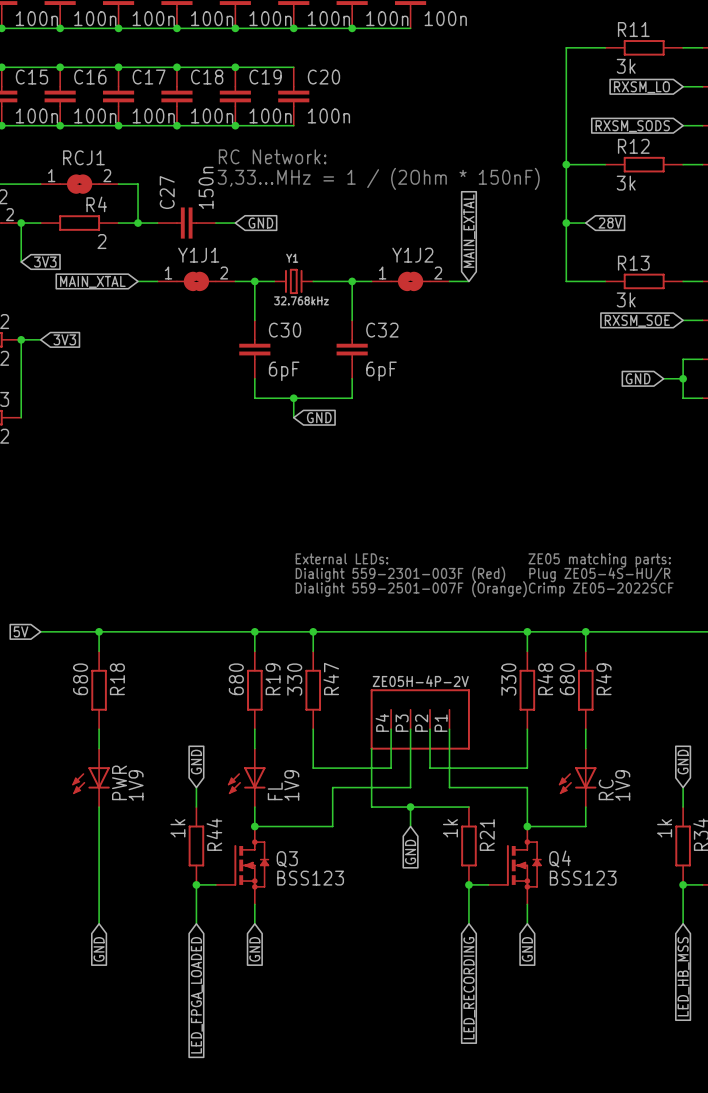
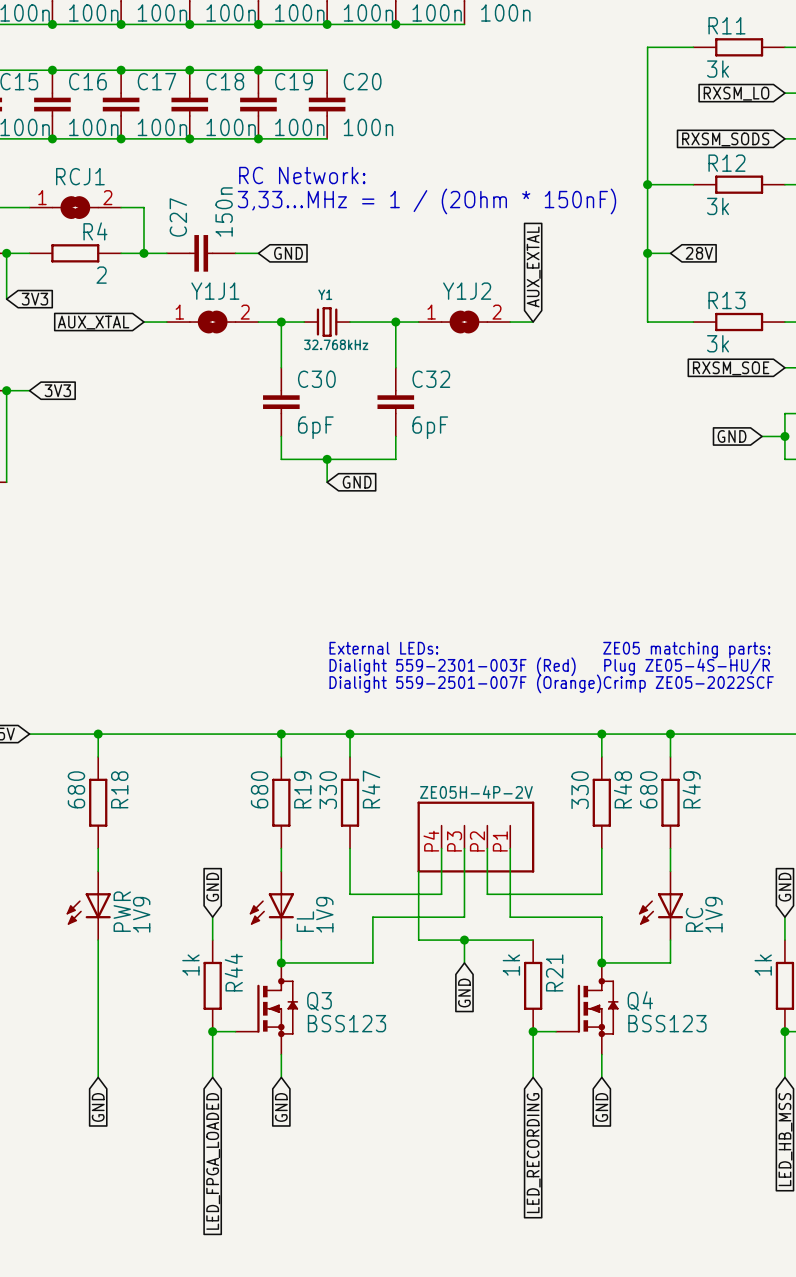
global label: MAIN_EXTAL (469, 231) -> AUX_EXTAL (533, 266)
global label: MAIN_XTAL (92, 281) -> AUX_XTAL (93, 322)

